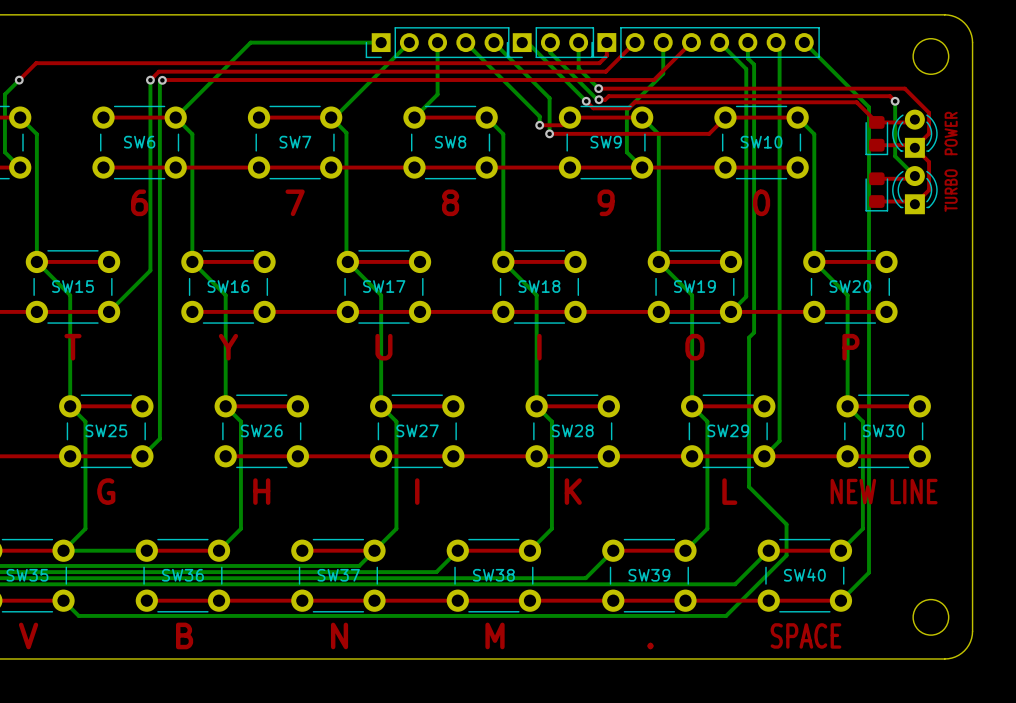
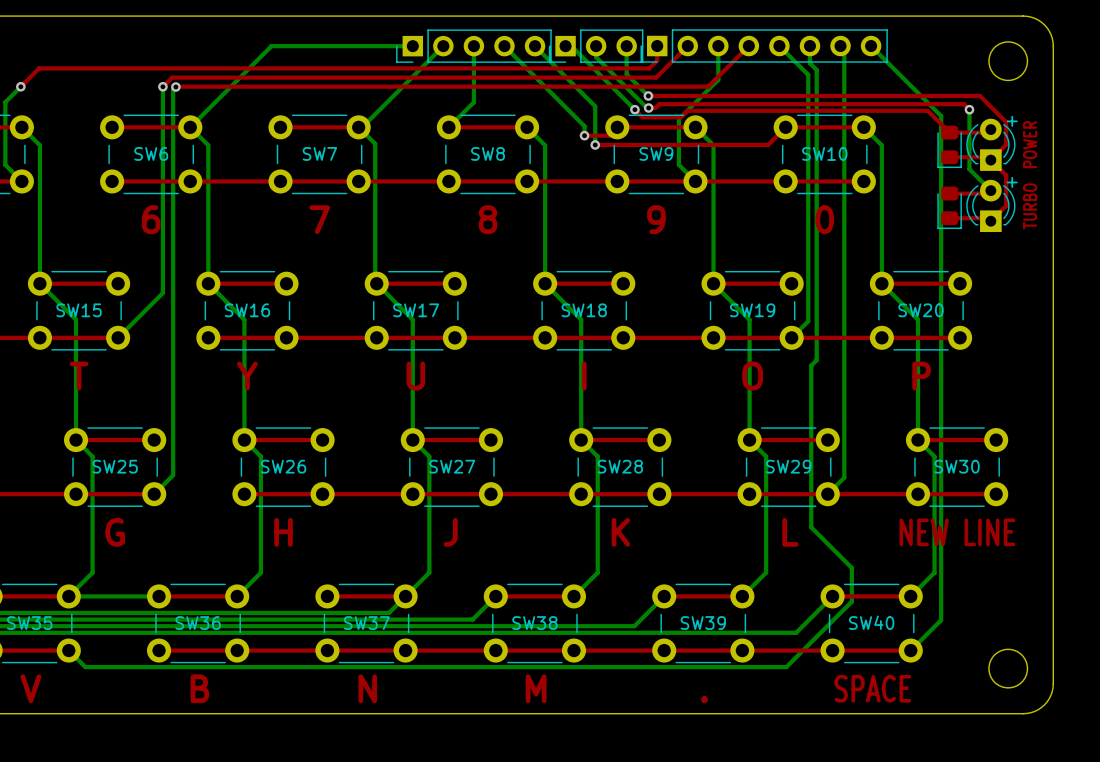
text: none -> + (1012, 121)
text: none -> + (1012, 182)
text: I (417, 491) -> J (450, 532)

